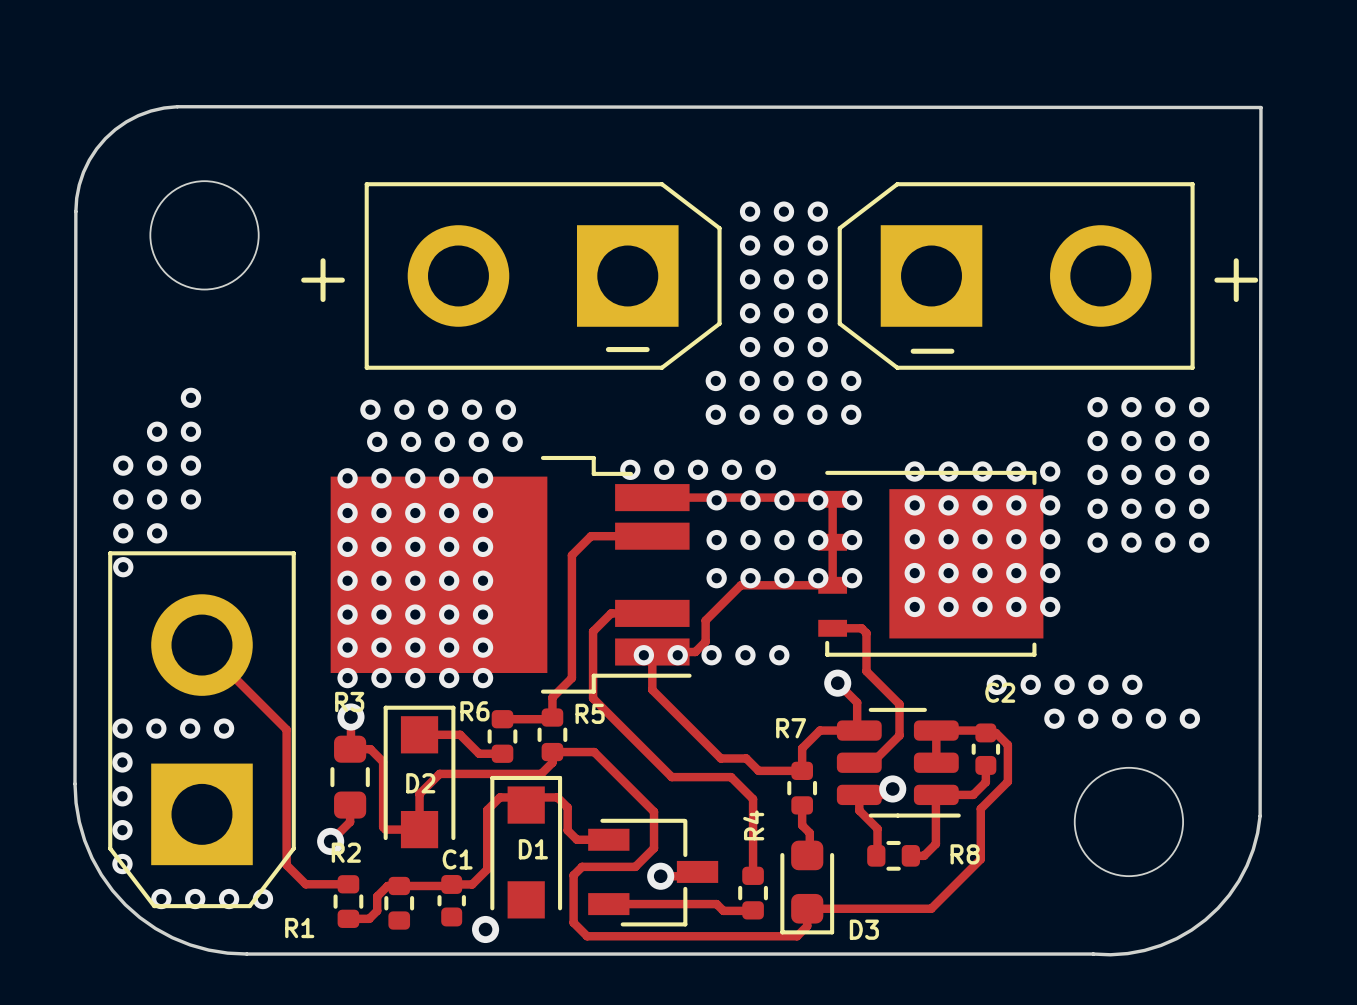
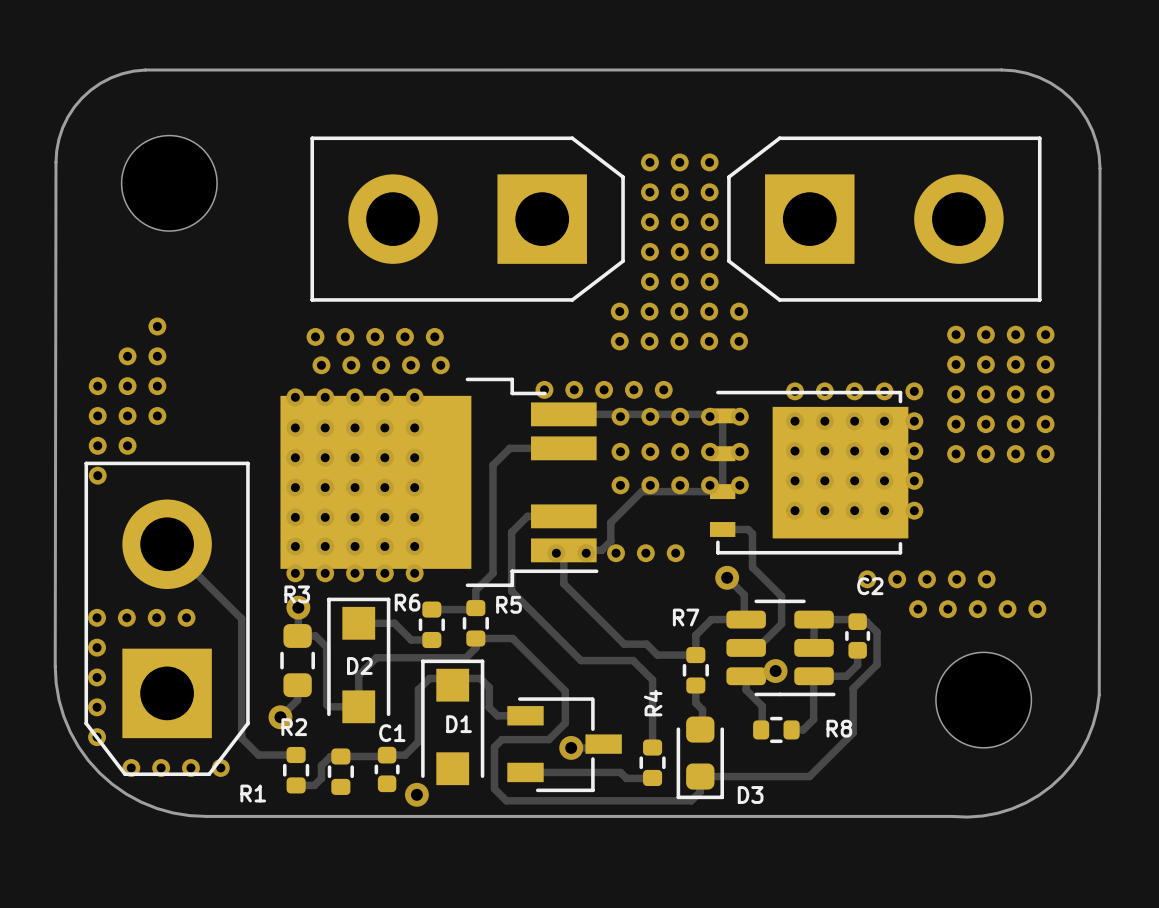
board edge: (177, 106) (1260, 107) (1260, 816) -> (145, 70) (1001, 69) (1027, 73) (1050, 83) (1061, 90) (1079, 108) (1092, 130) (1099, 155) (1099, 694)
part text: + (323, 280) -> none
part text: + (1236, 280) -> none
part text: - (627, 349) -> none
part text: - (932, 351) -> none

